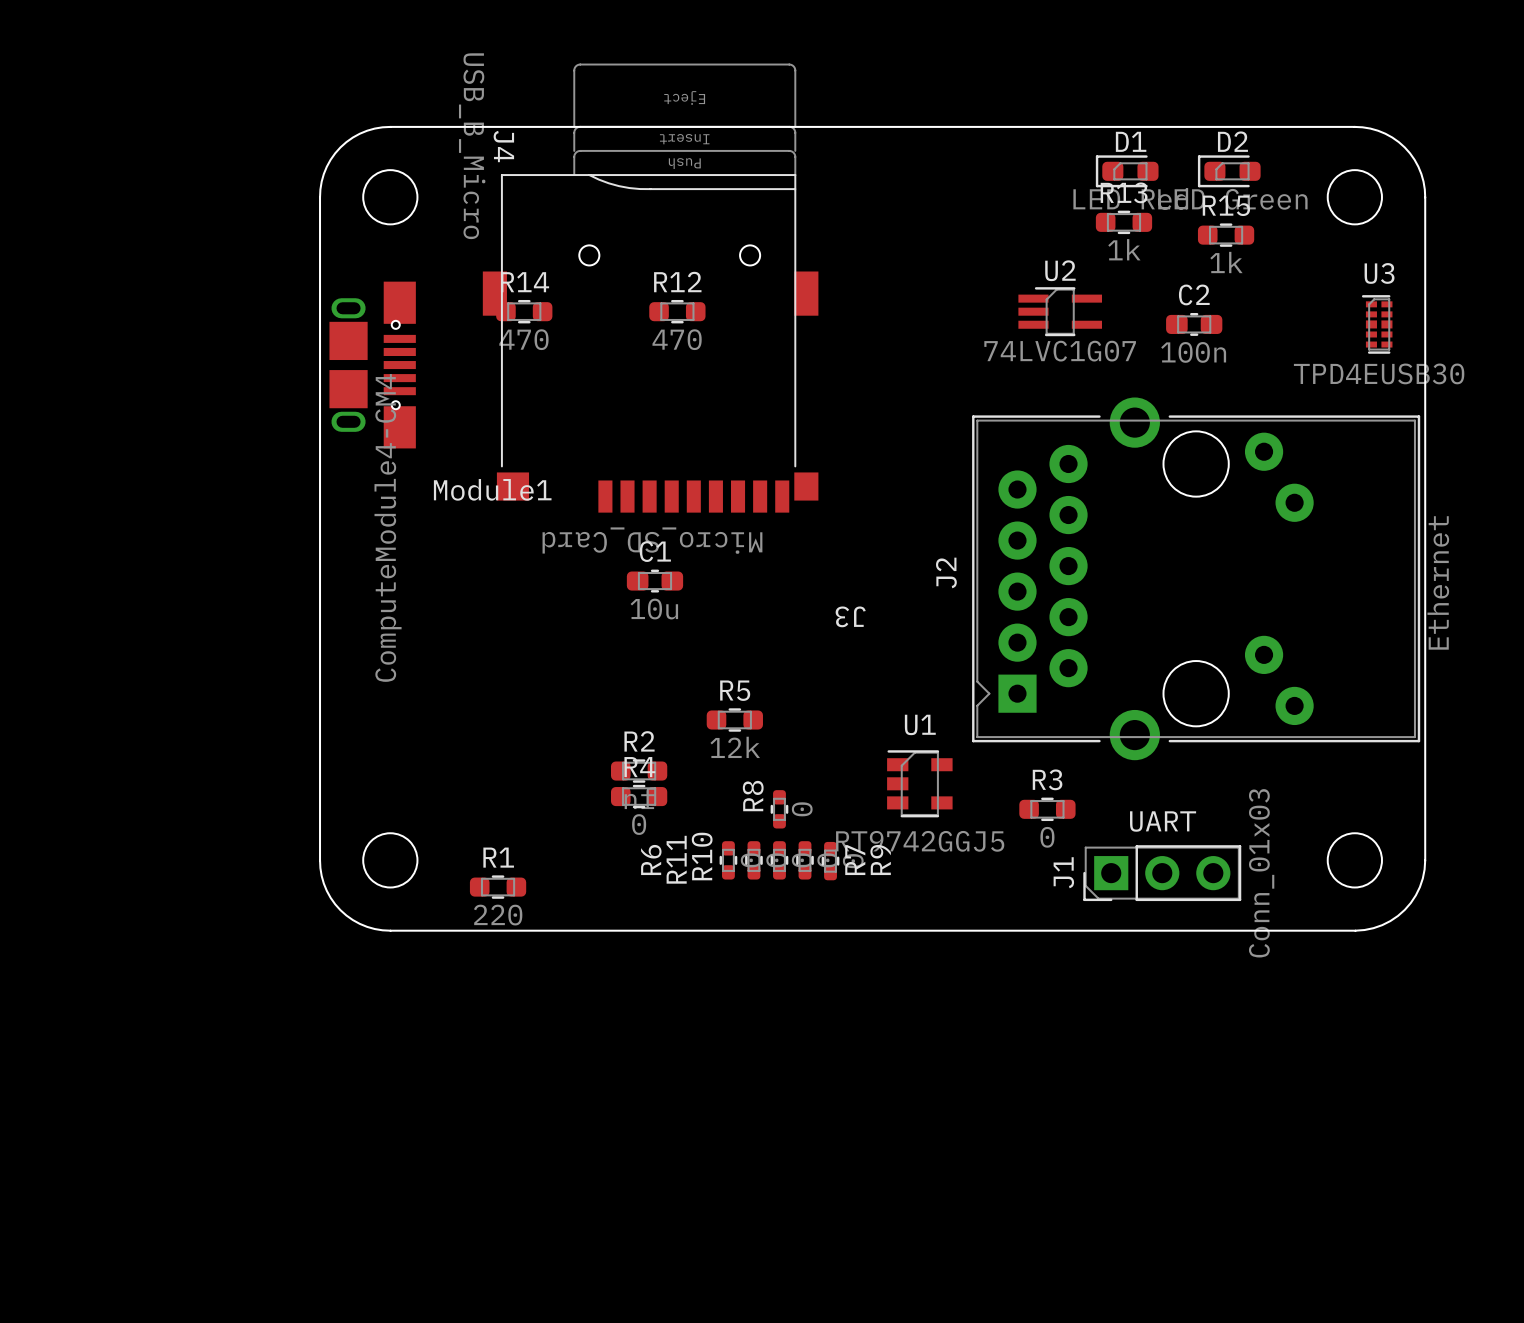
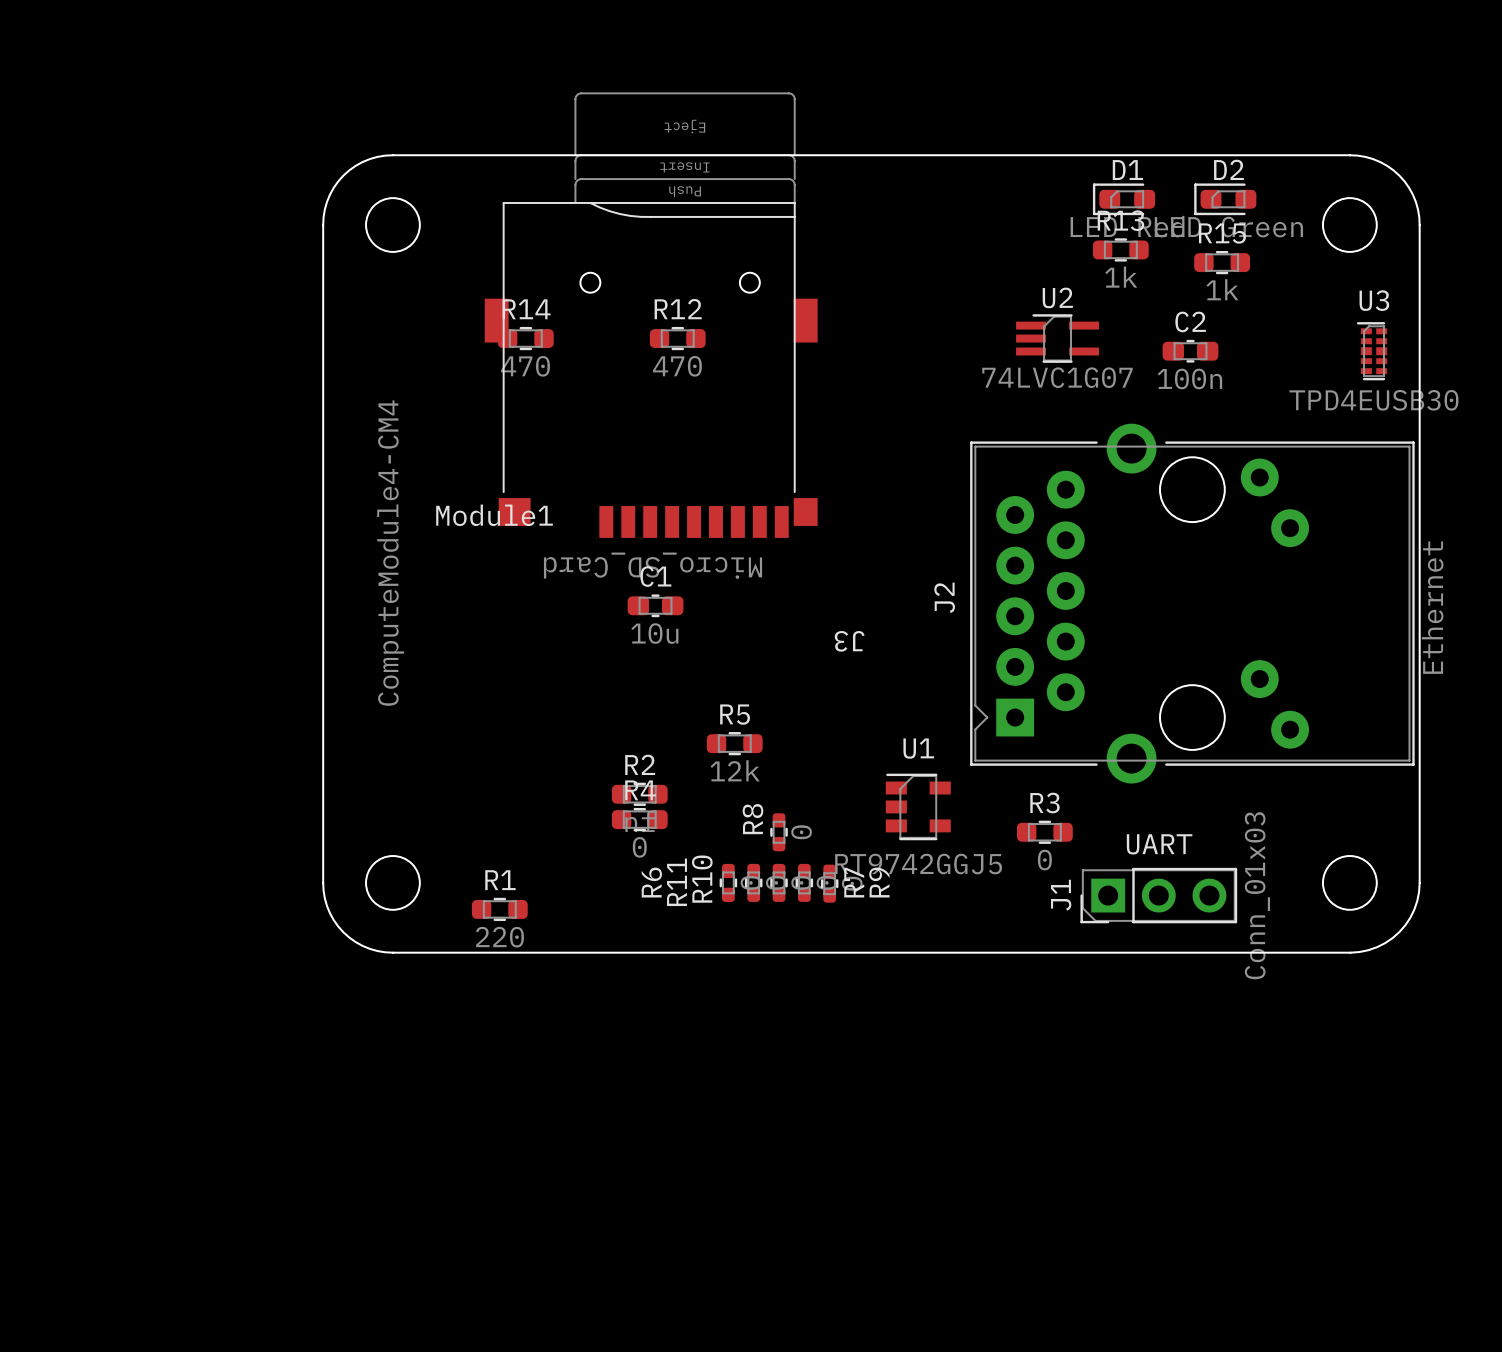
J4: USB_B_Micro (372, 365) -> none

